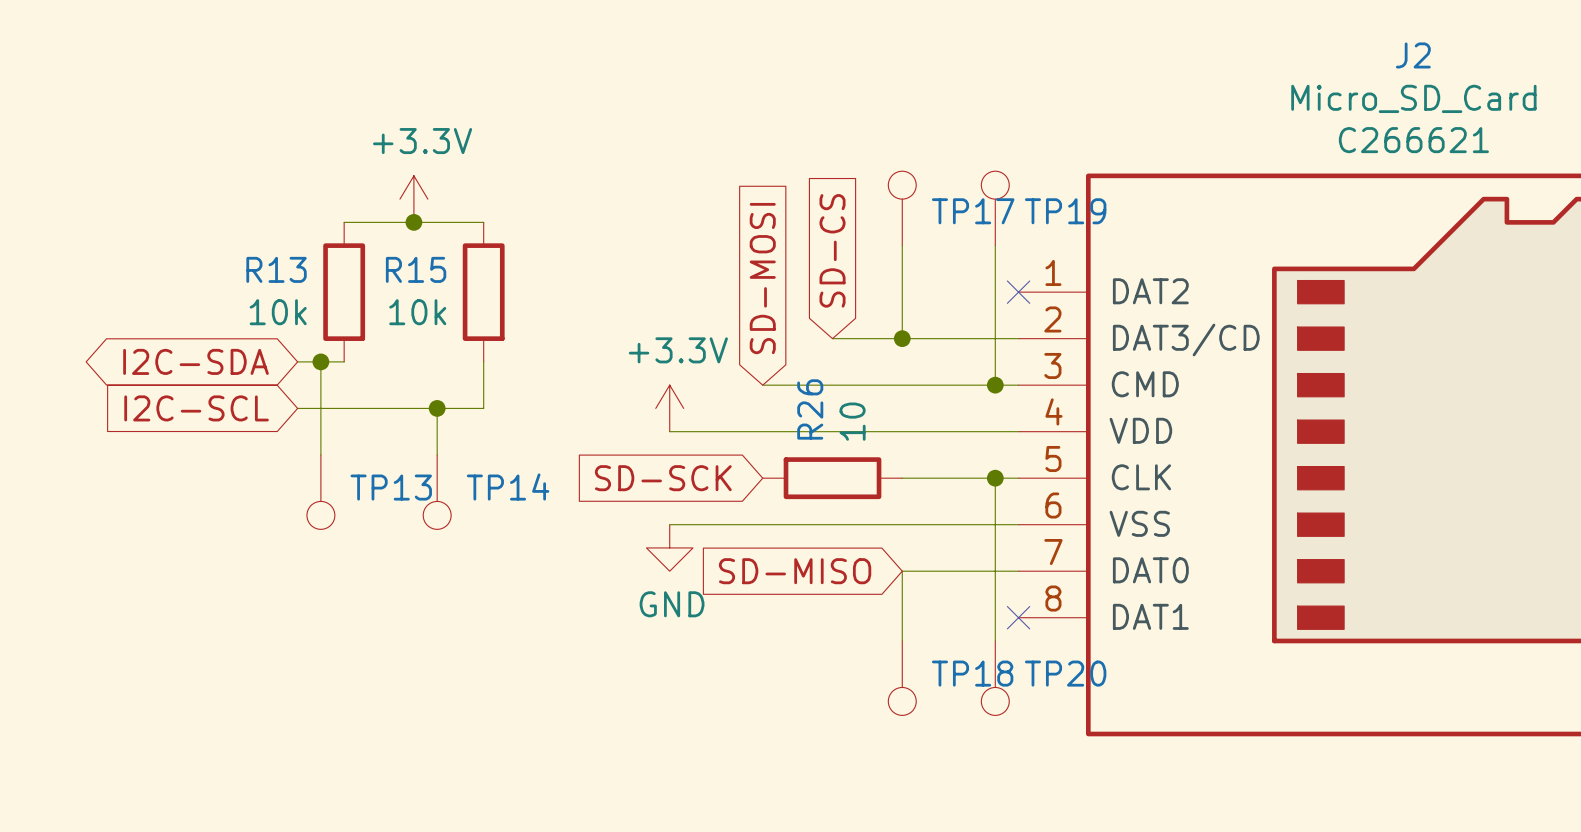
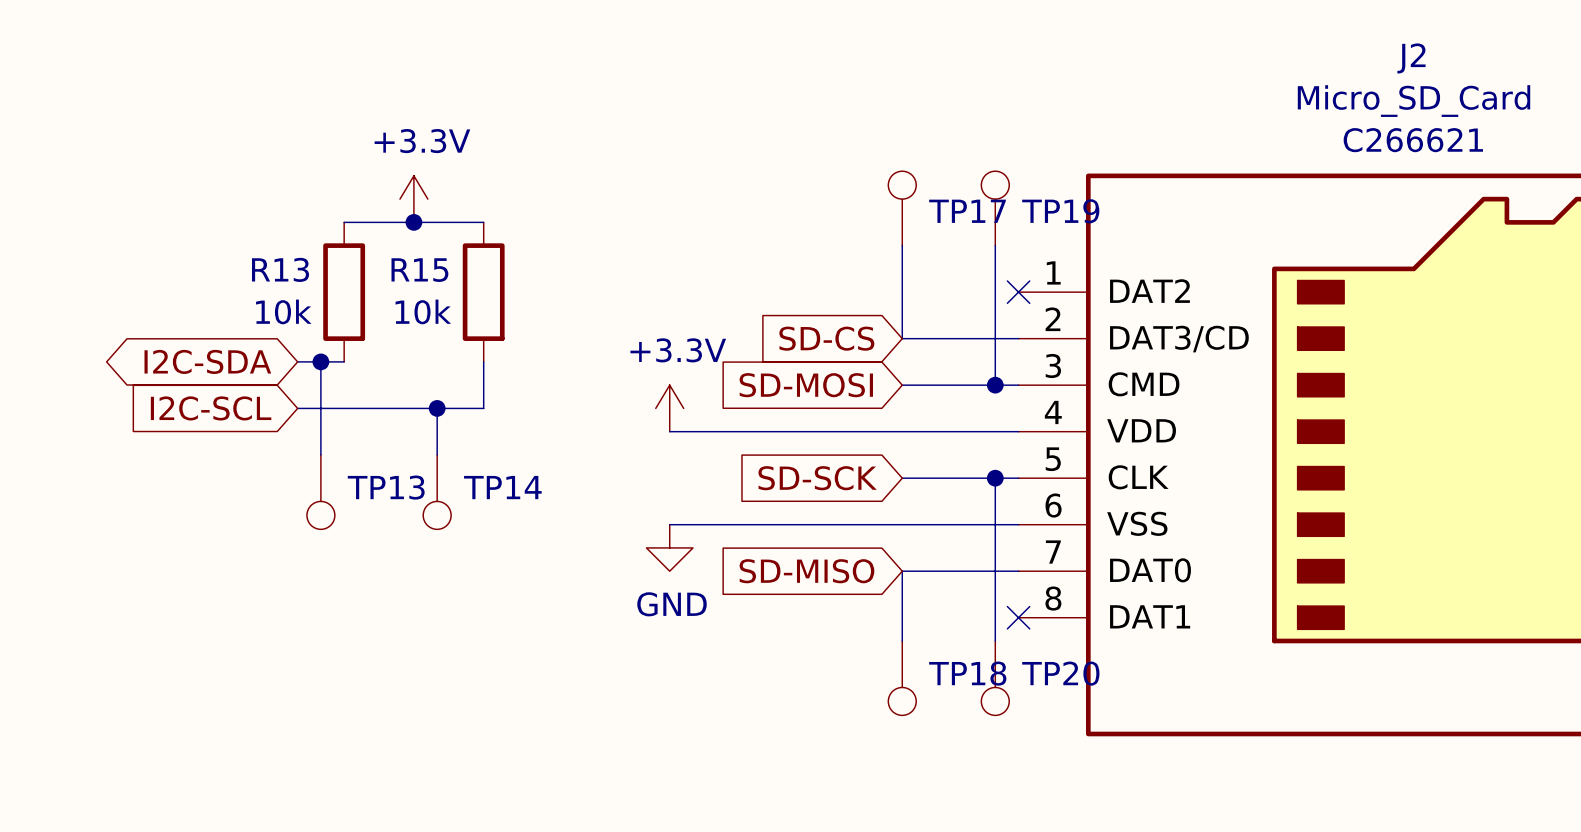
global label rotation: 0° (832, 250) -> 90° counterclockwise (826, 338)
global label rotation: 0° (762, 278) -> 90° counterclockwise (806, 385)
wire: (832, 338) (902, 338) -> none
junction: (902, 338) -> none
wire: (762, 385) (902, 385) -> none
global label position: SD-SCK (663, 478) -> SD-SCK (817, 478)
R26: 10 (832, 478) -> none

